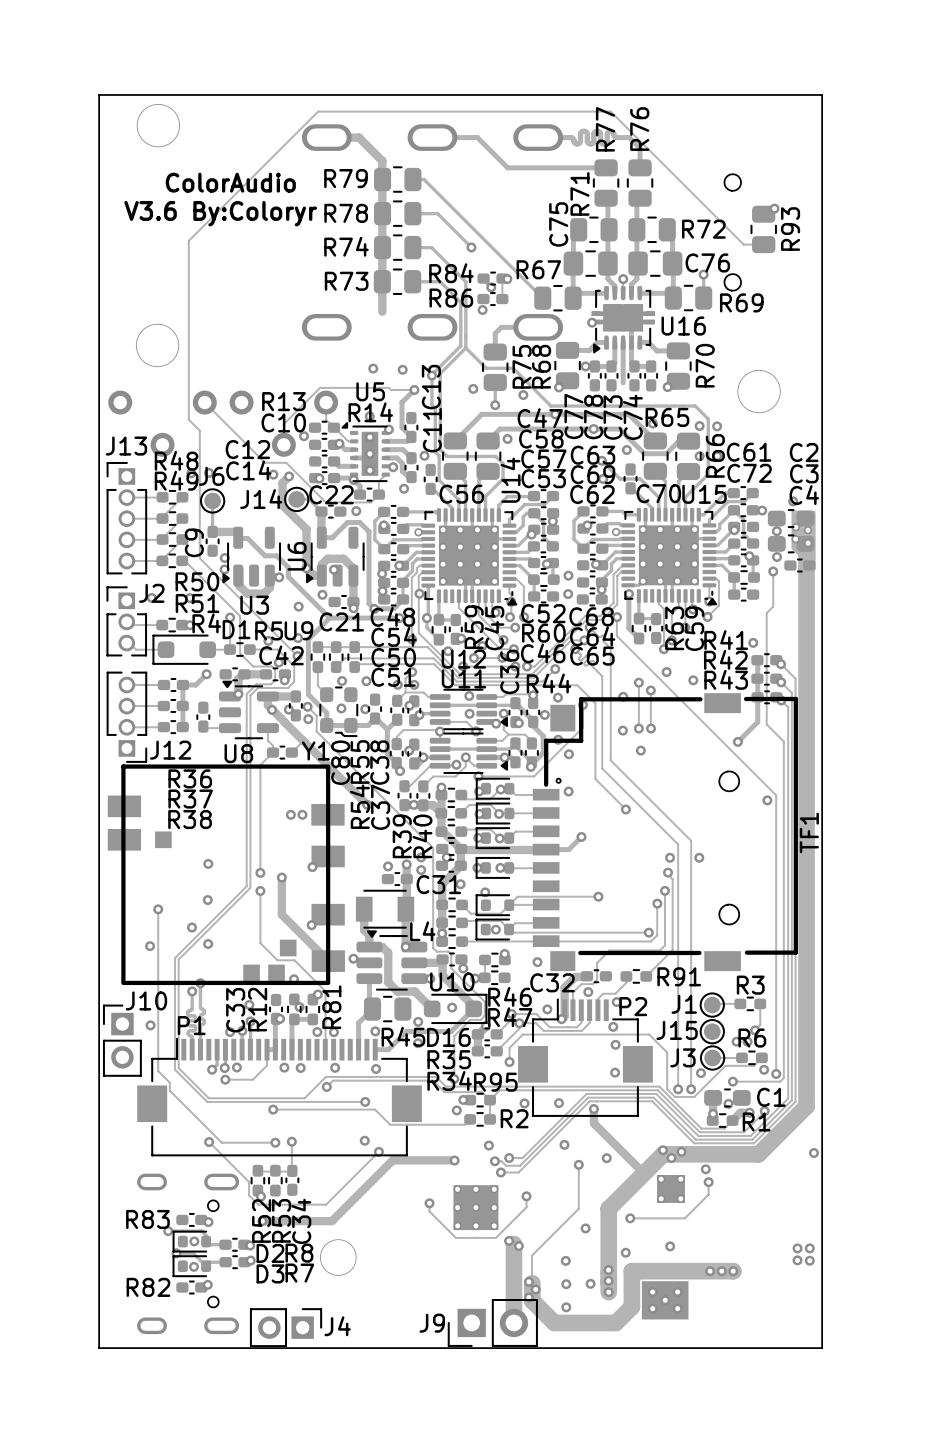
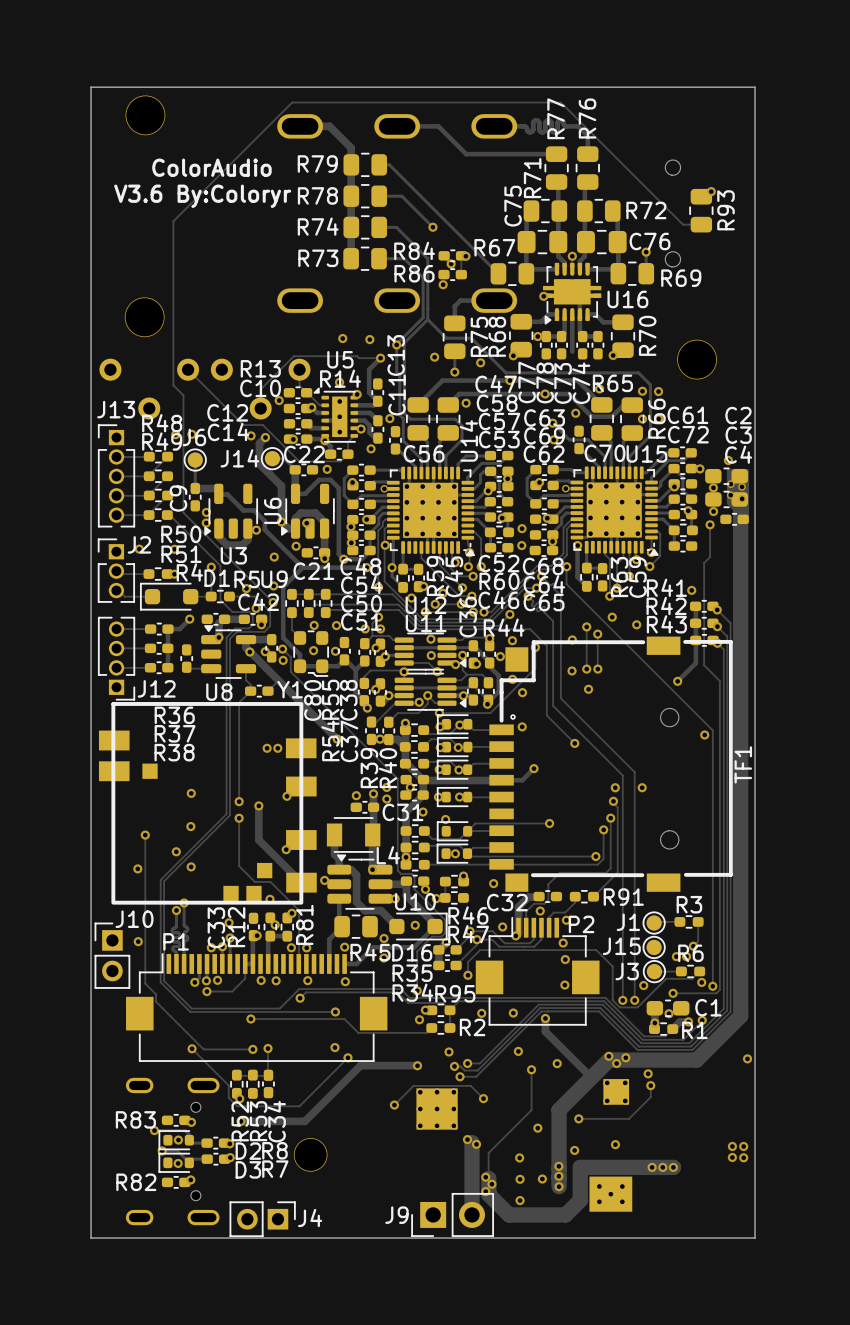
track: (382, 281) (382, 311) -> none
track: (526, 1196) (526, 1207) (495, 1237) (455, 1237) (429, 1211) (429, 1203) -> (483, 1098) (470, 1085) (413, 1085) (394, 1105)

